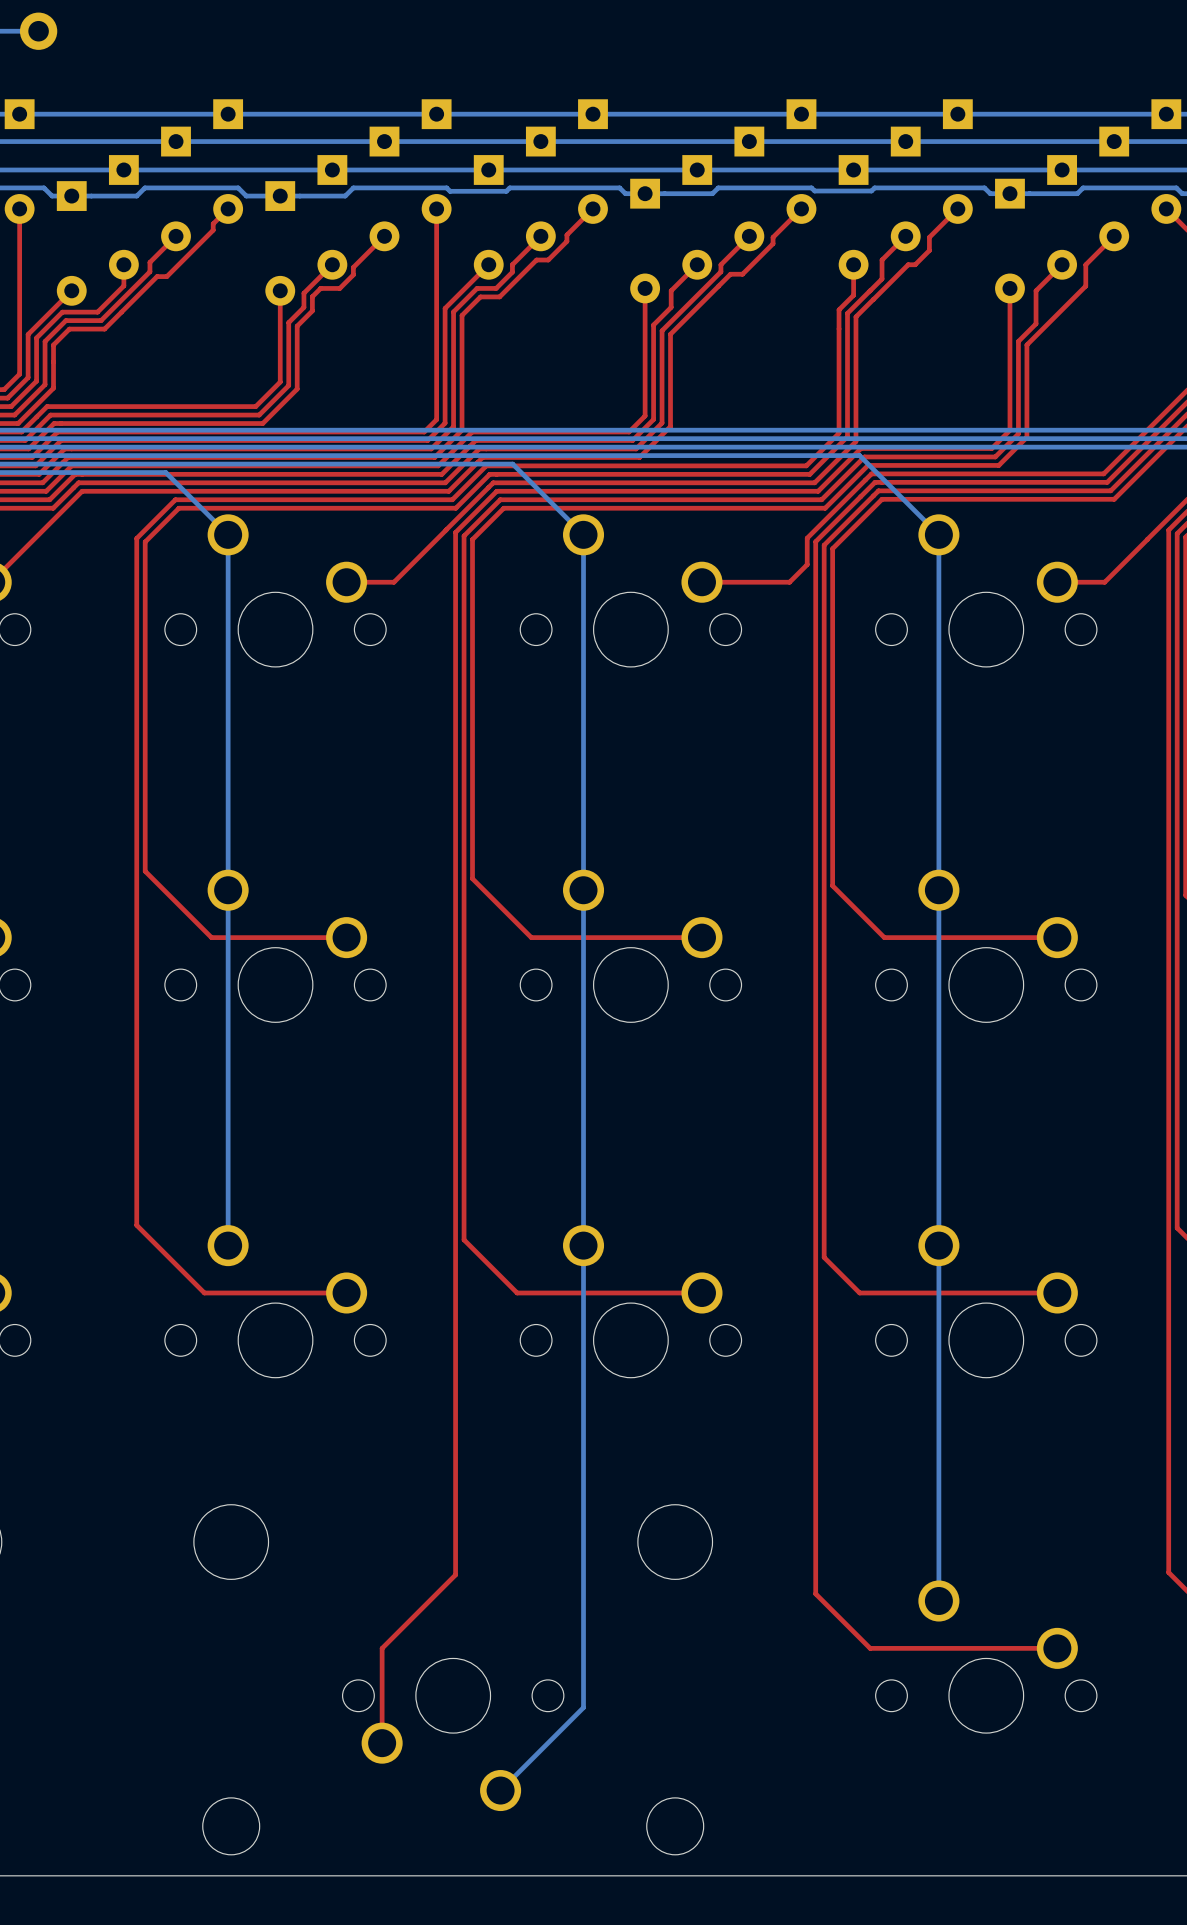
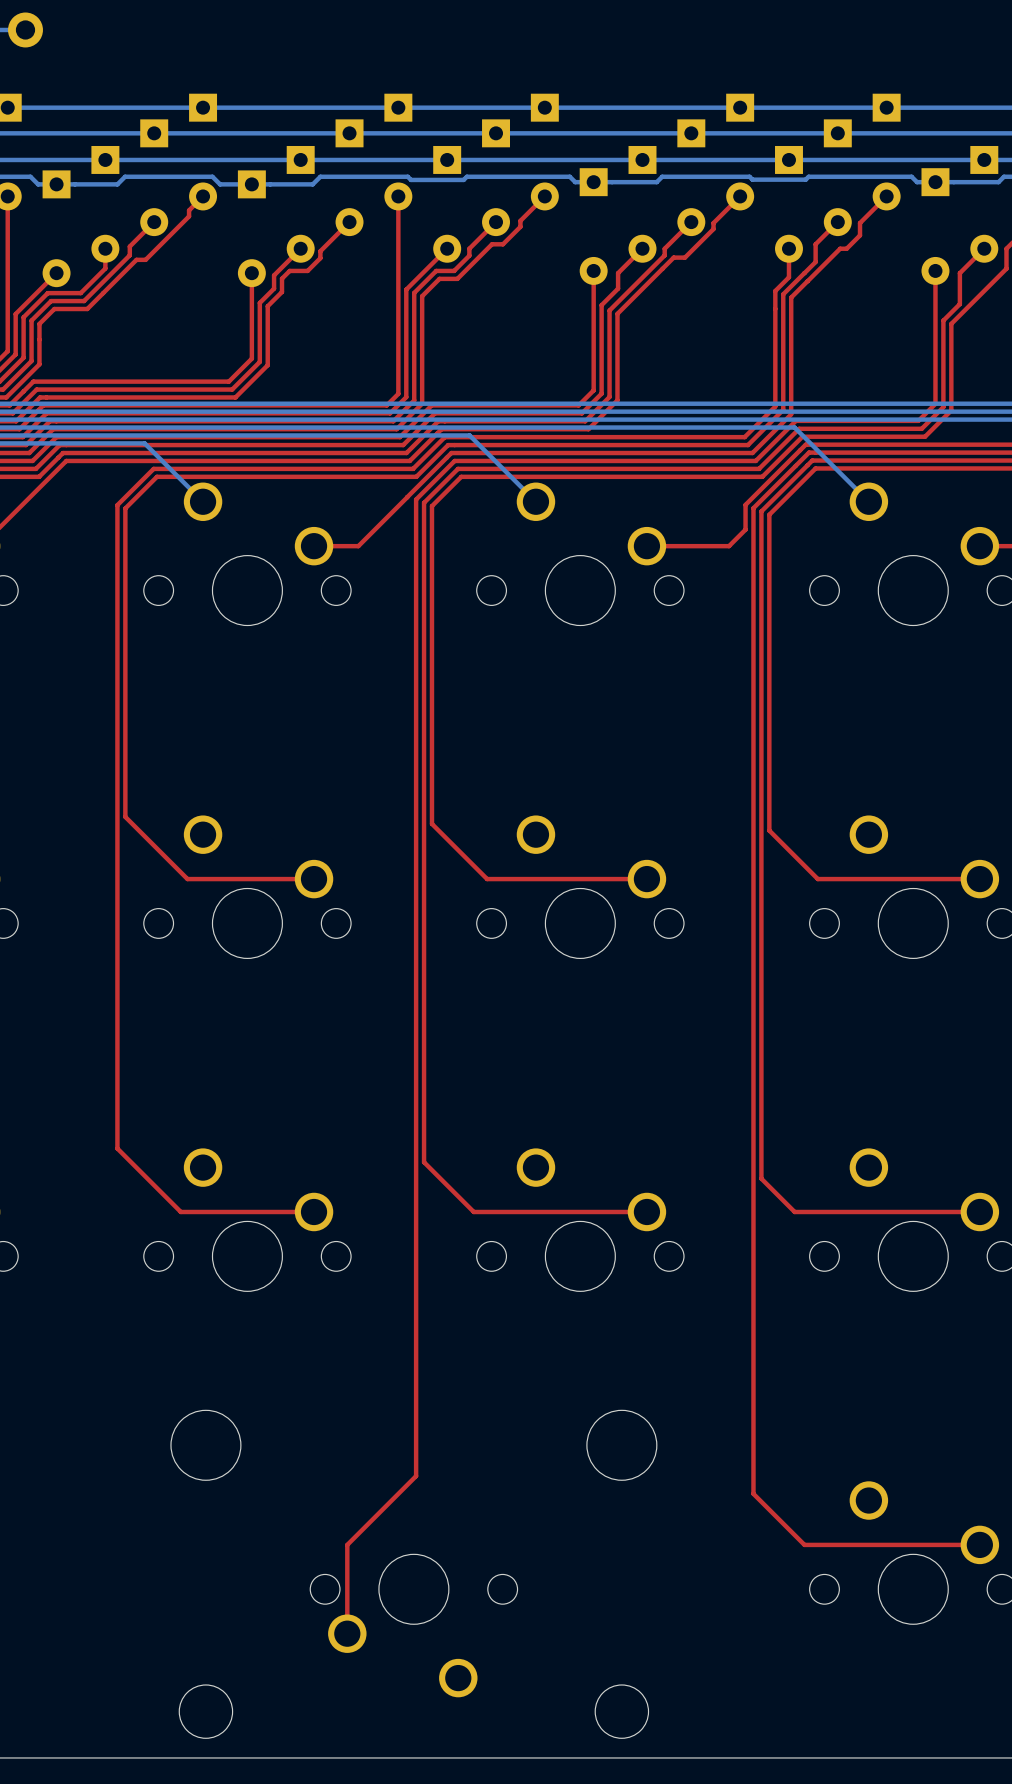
bottom track: (228, 534) (228, 1245) -> none
bottom track: (583, 534) (583, 1707) (500, 1790) -> none
bottom track: (938, 534) (938, 1600) -> none

